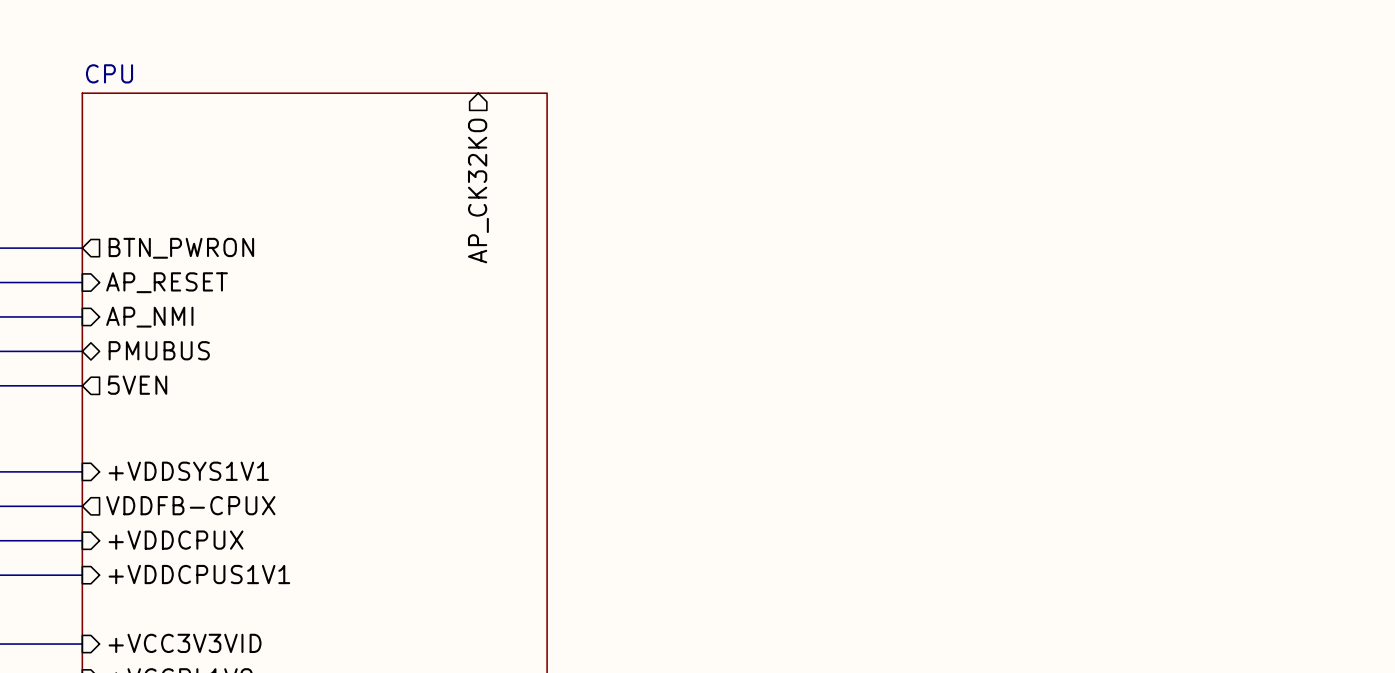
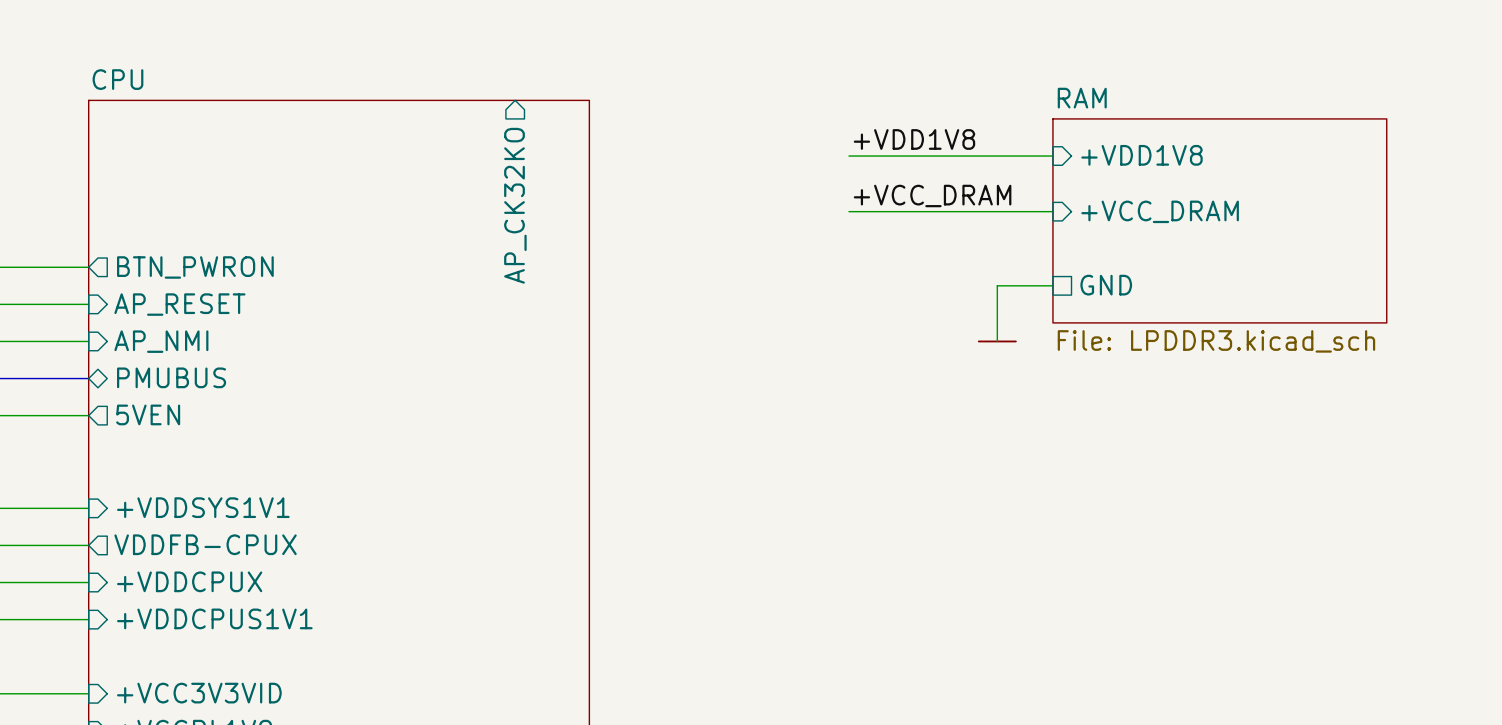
label: none -> +VDD1V8 (914, 139)
wire: none -> (848, 156) (1052, 156)
sheet pin: none -> +VDD1V8 (1141, 155)
label: none -> +VCC_DRAM (932, 195)
wire: none -> (848, 211) (1052, 211)
sheet pin: none -> +VCC_DRAM (1160, 211)
sheet RAM: none -> File: LPDDR3.kicad_sch (1219, 220)
sheet pin: none -> GND (1106, 285)
wire: none -> (1052, 285) (997, 285) (997, 341)
power symbol: none -> (997, 341)

